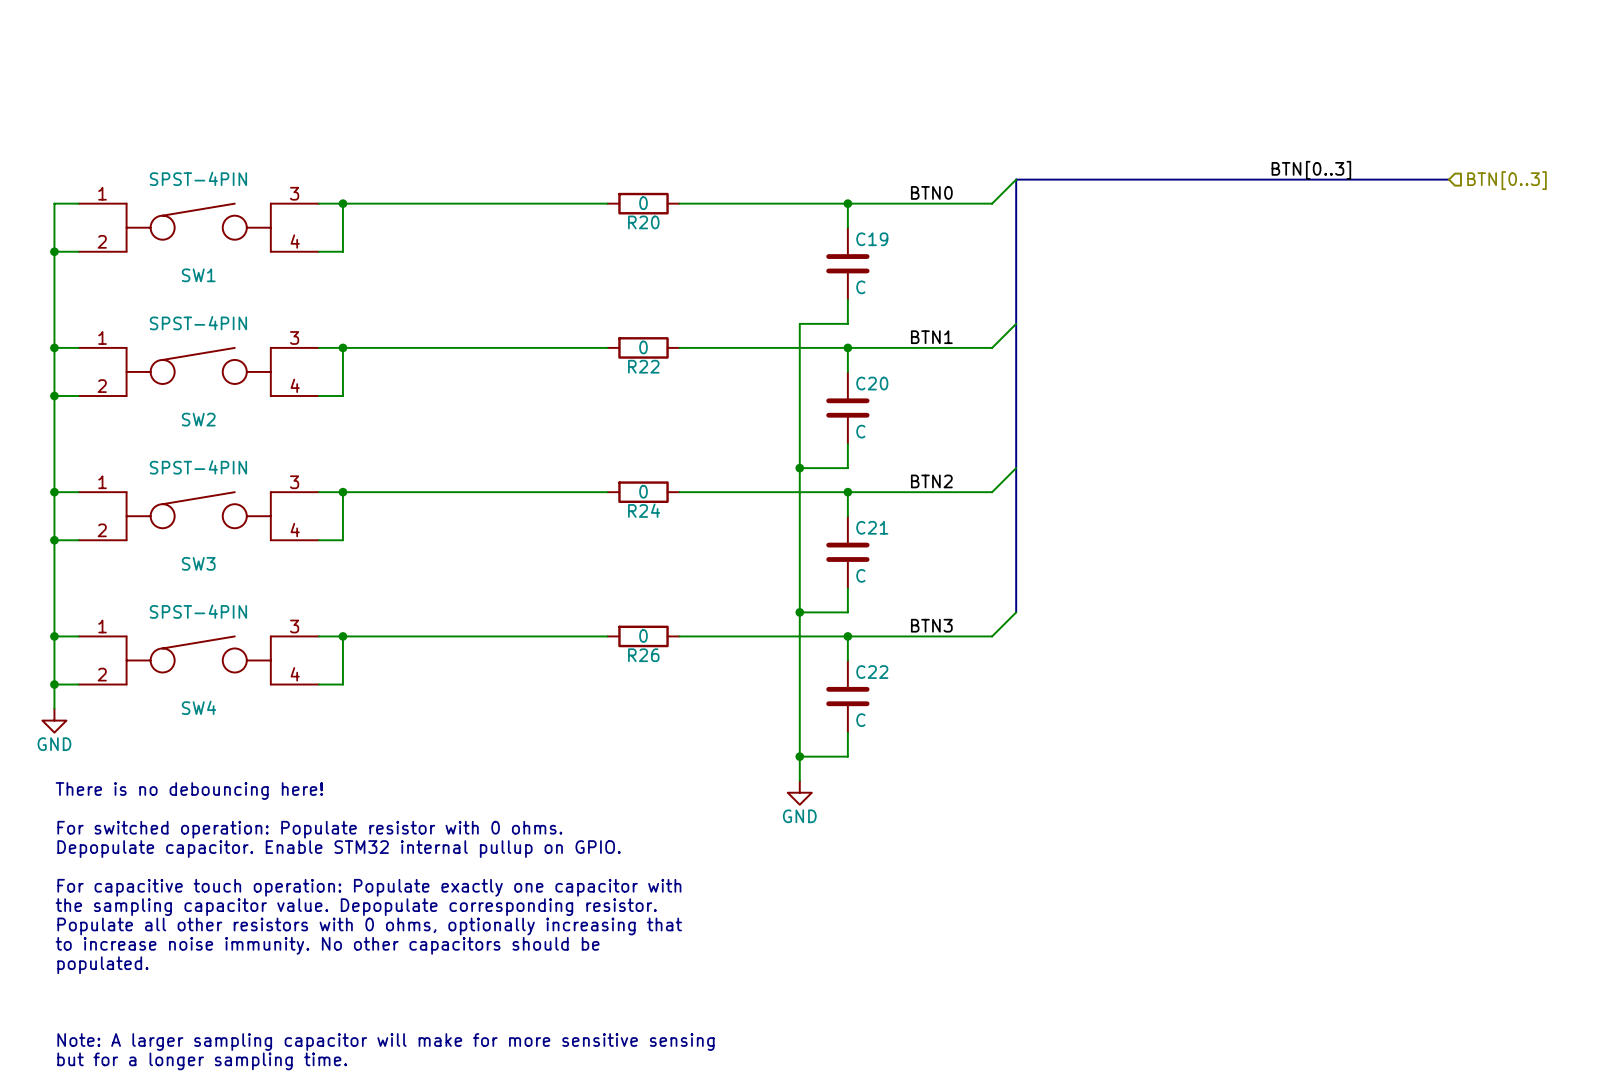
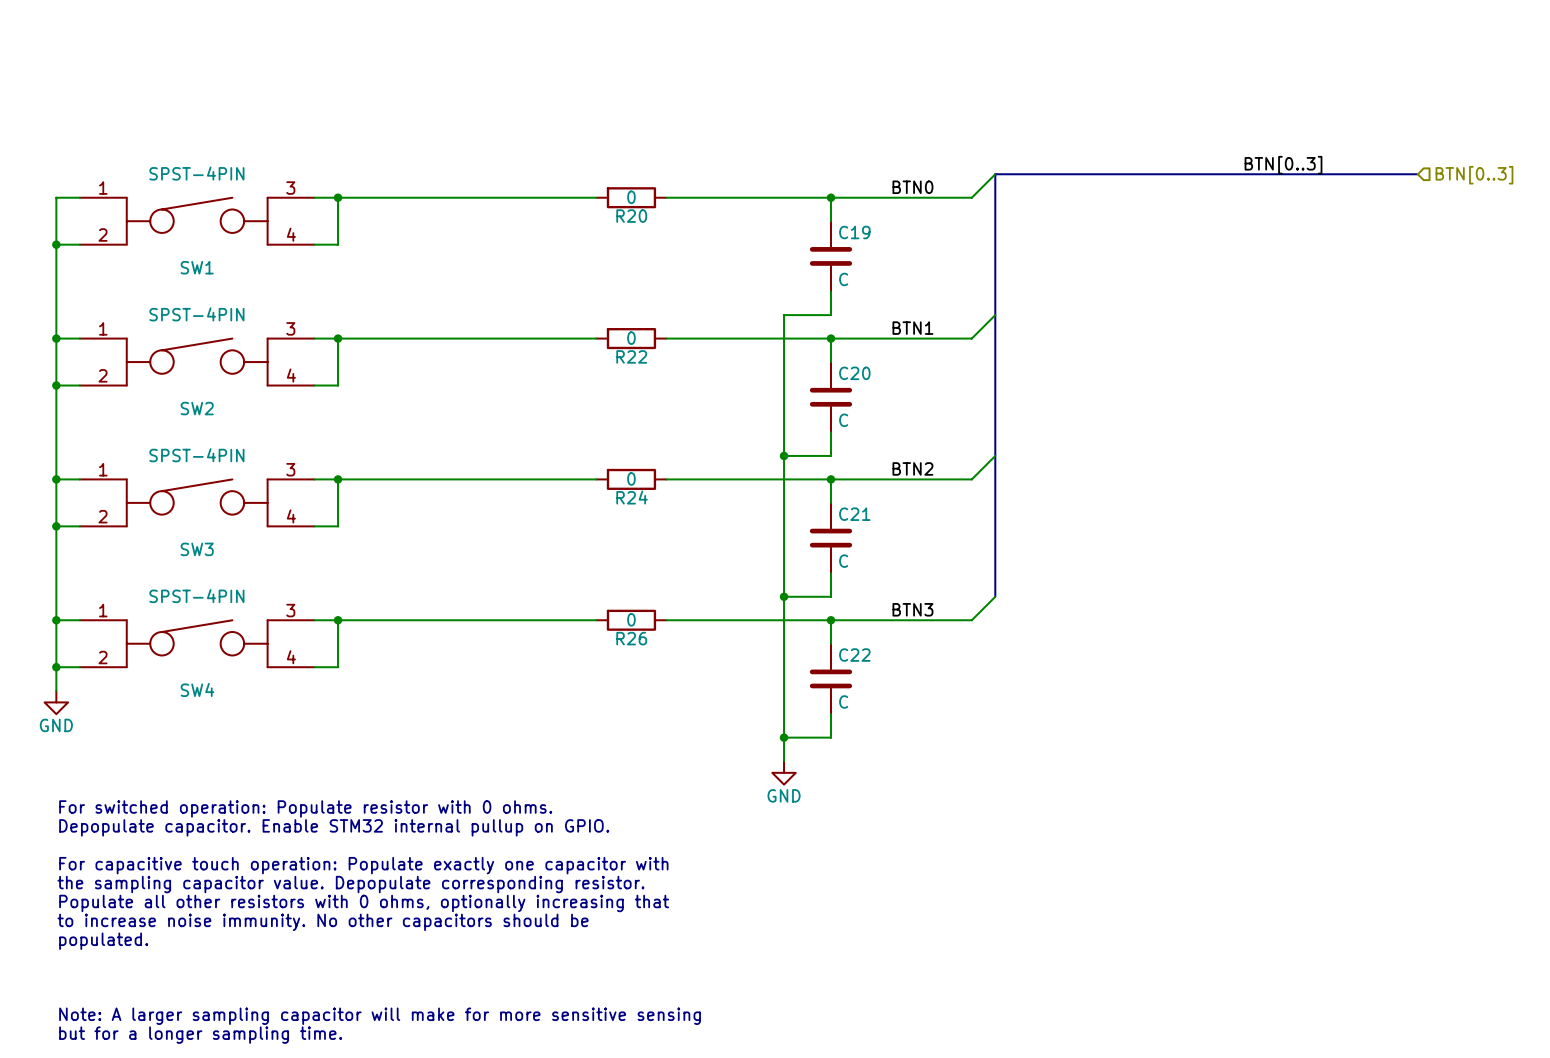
text: There is no debouncing here! (189, 791) -> none

